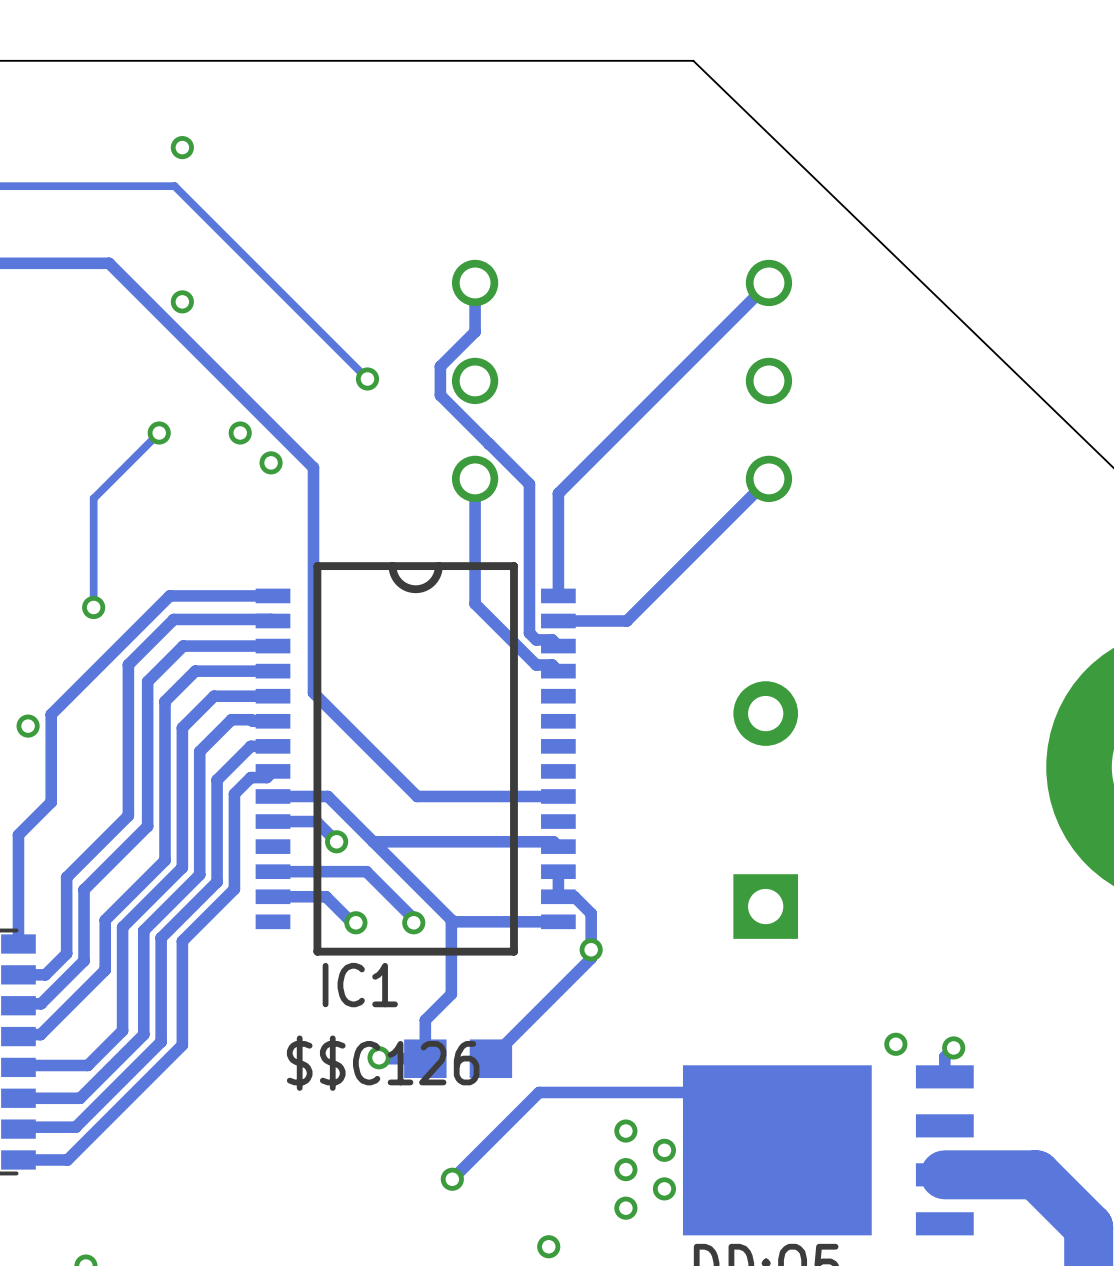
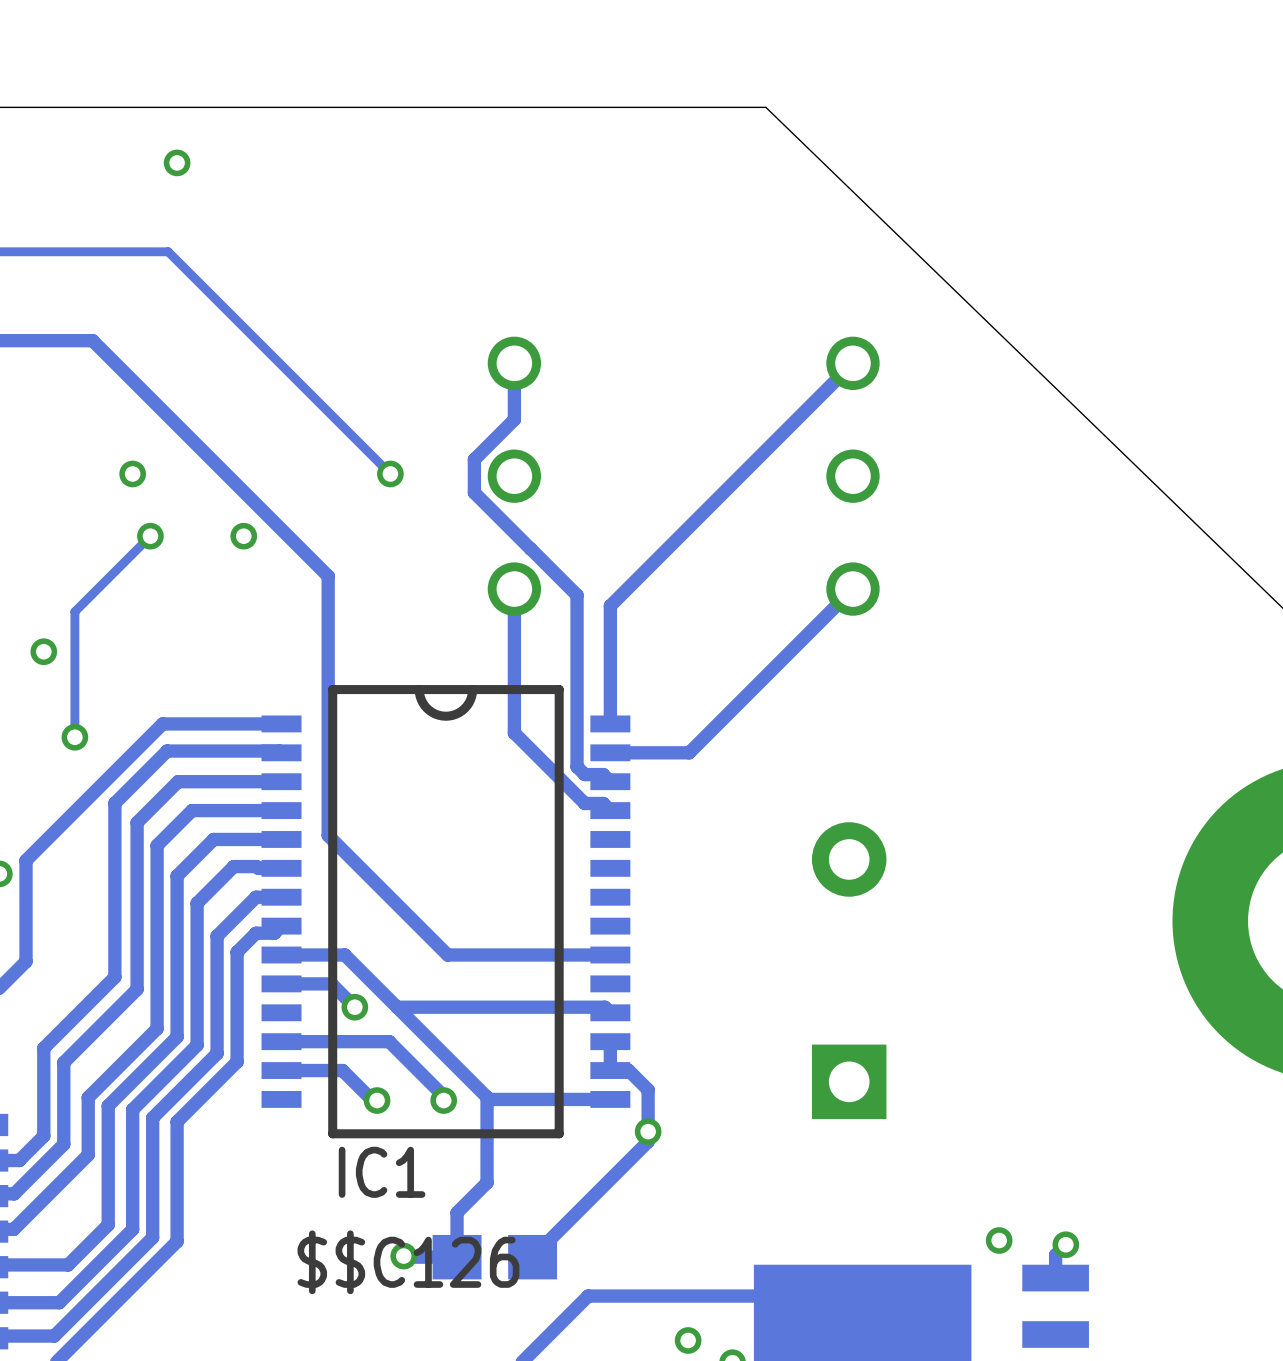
via position: (182, 147) -> (177, 162)
via: (182, 301) -> none
via: none -> (132, 473)
via: (271, 462) -> none
via: none -> (43, 651)

